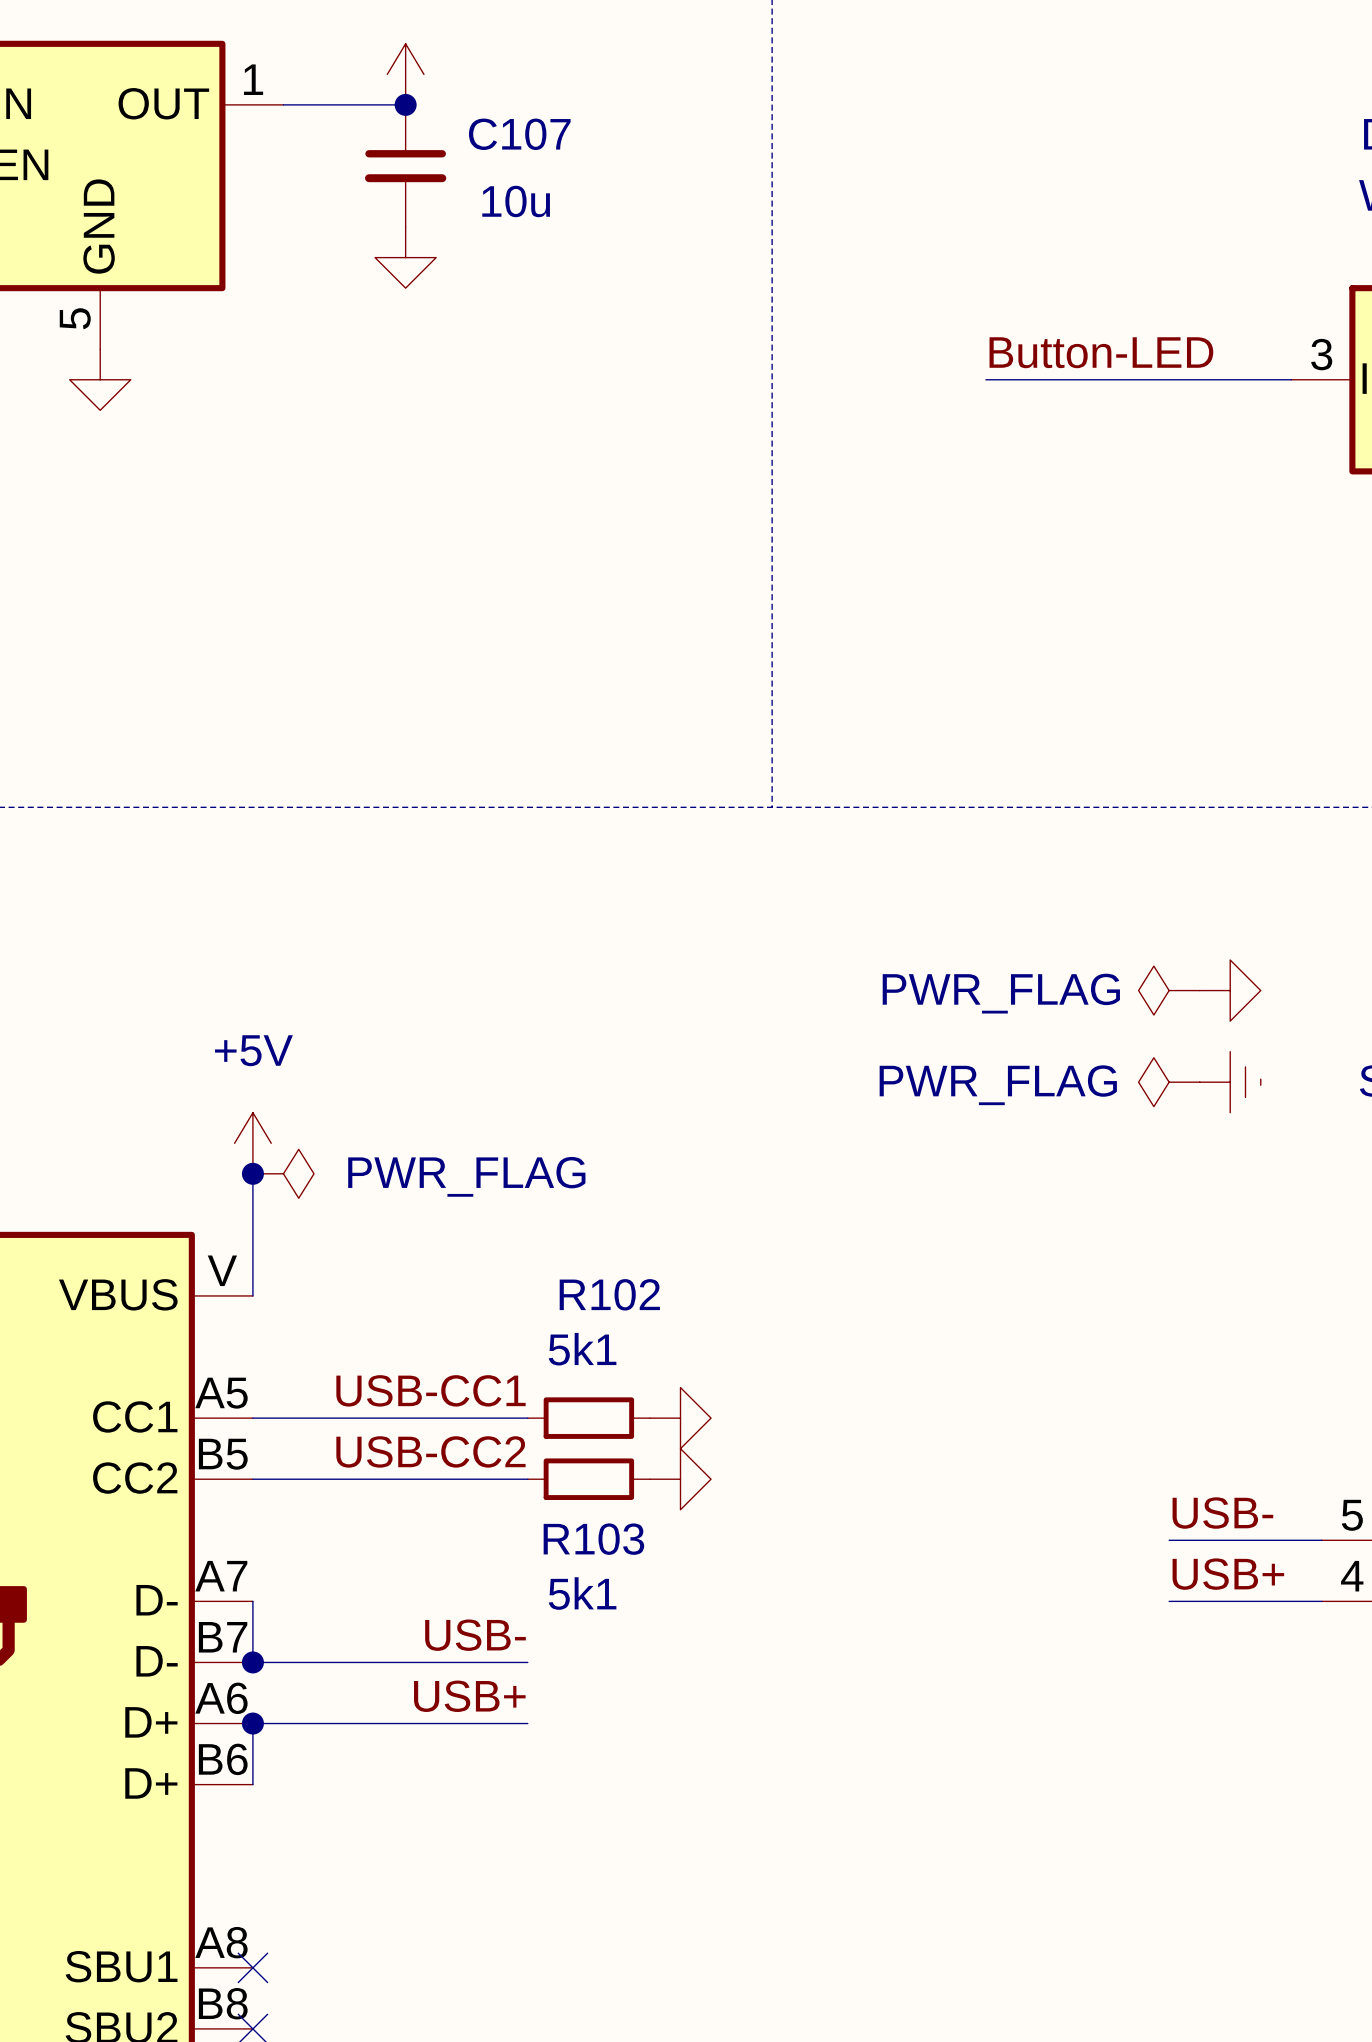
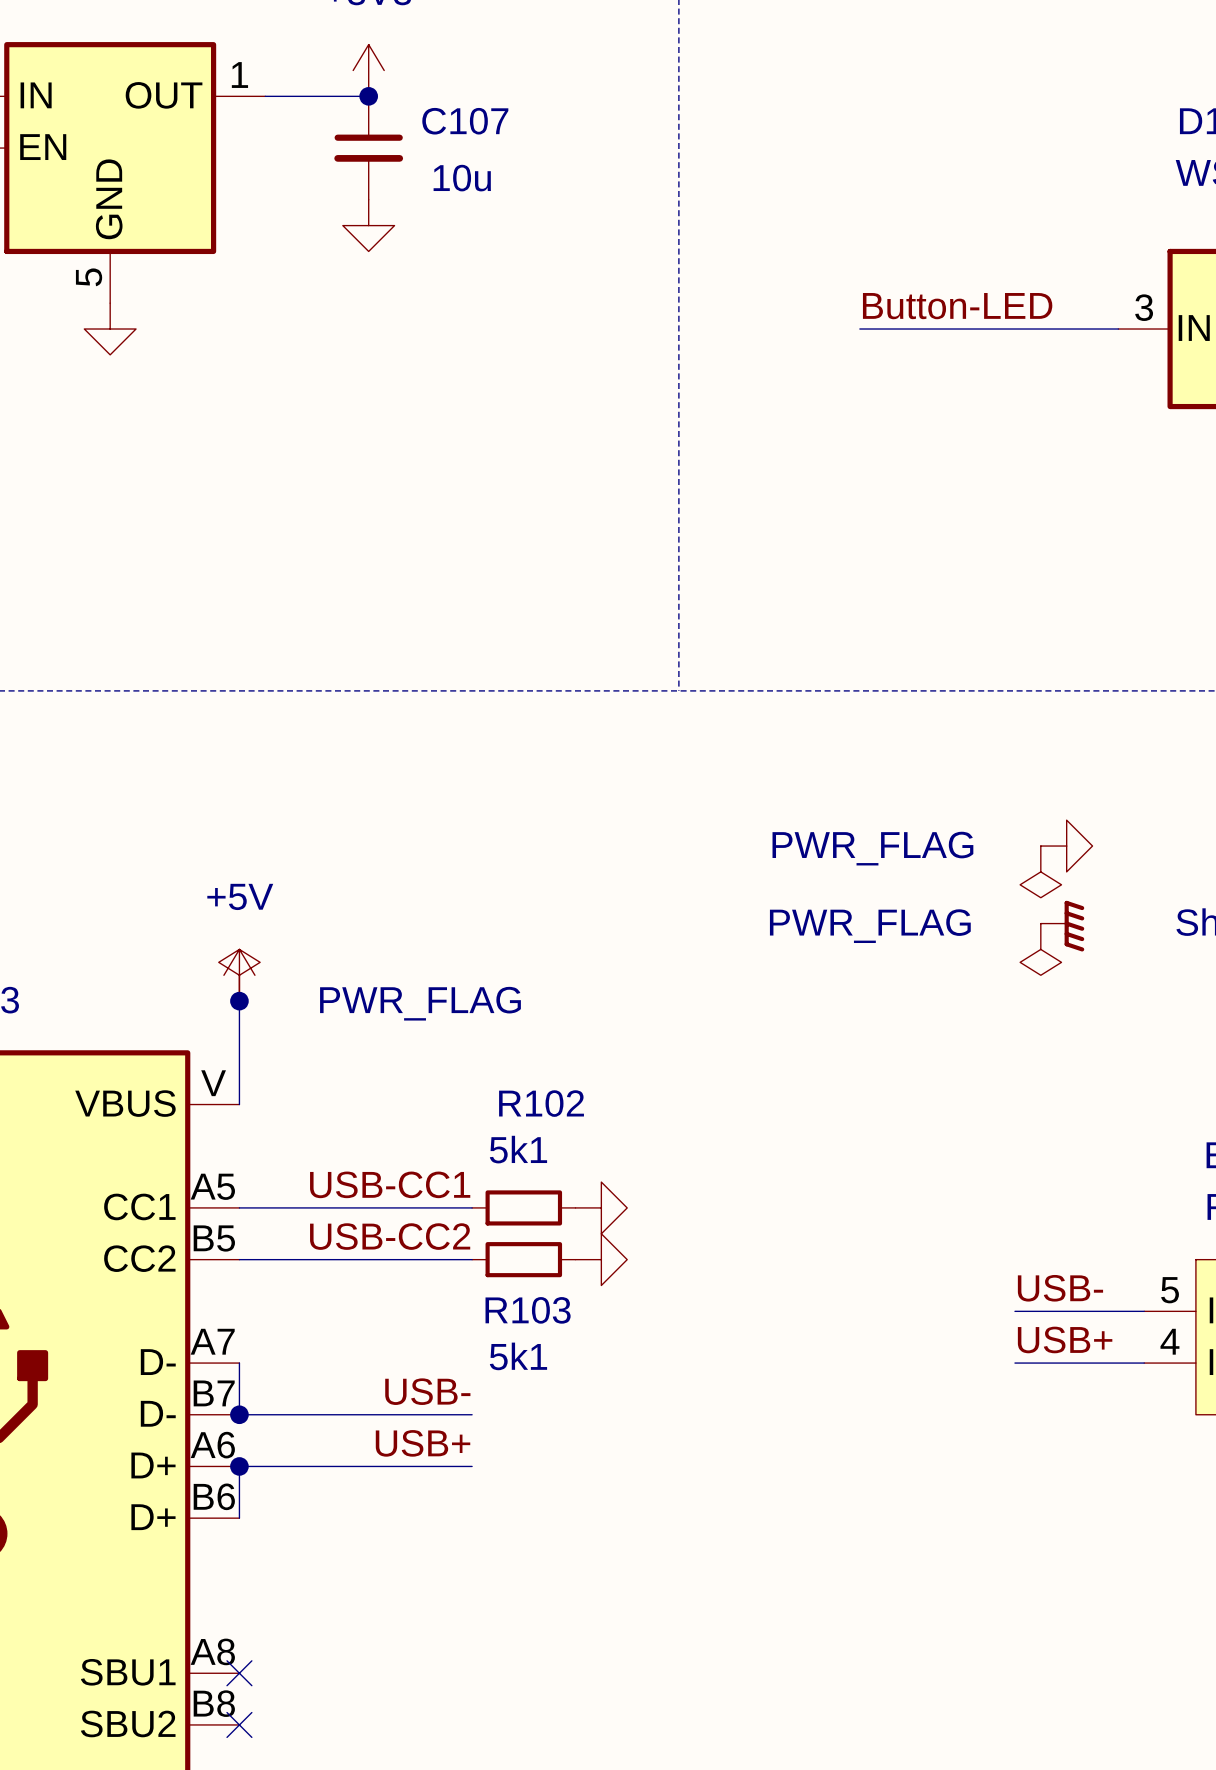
power symbol: PWR_FLAG (1169, 990) -> none
power symbol: none -> PWR_FLAG (1040, 871)
power symbol shape: [1199, 1051, 1261, 1113] -> [1040, 900, 1085, 952]
power symbol: PWR_FLAG (1169, 1082) -> none
power symbol: none -> PWR_FLAG (1040, 949)
power symbol rotation: 0° (283, 1173) -> 90° counterclockwise (239, 975)
power symbol position: PWR_FLAG (283, 1173) -> PWR_FLAG (239, 975)

